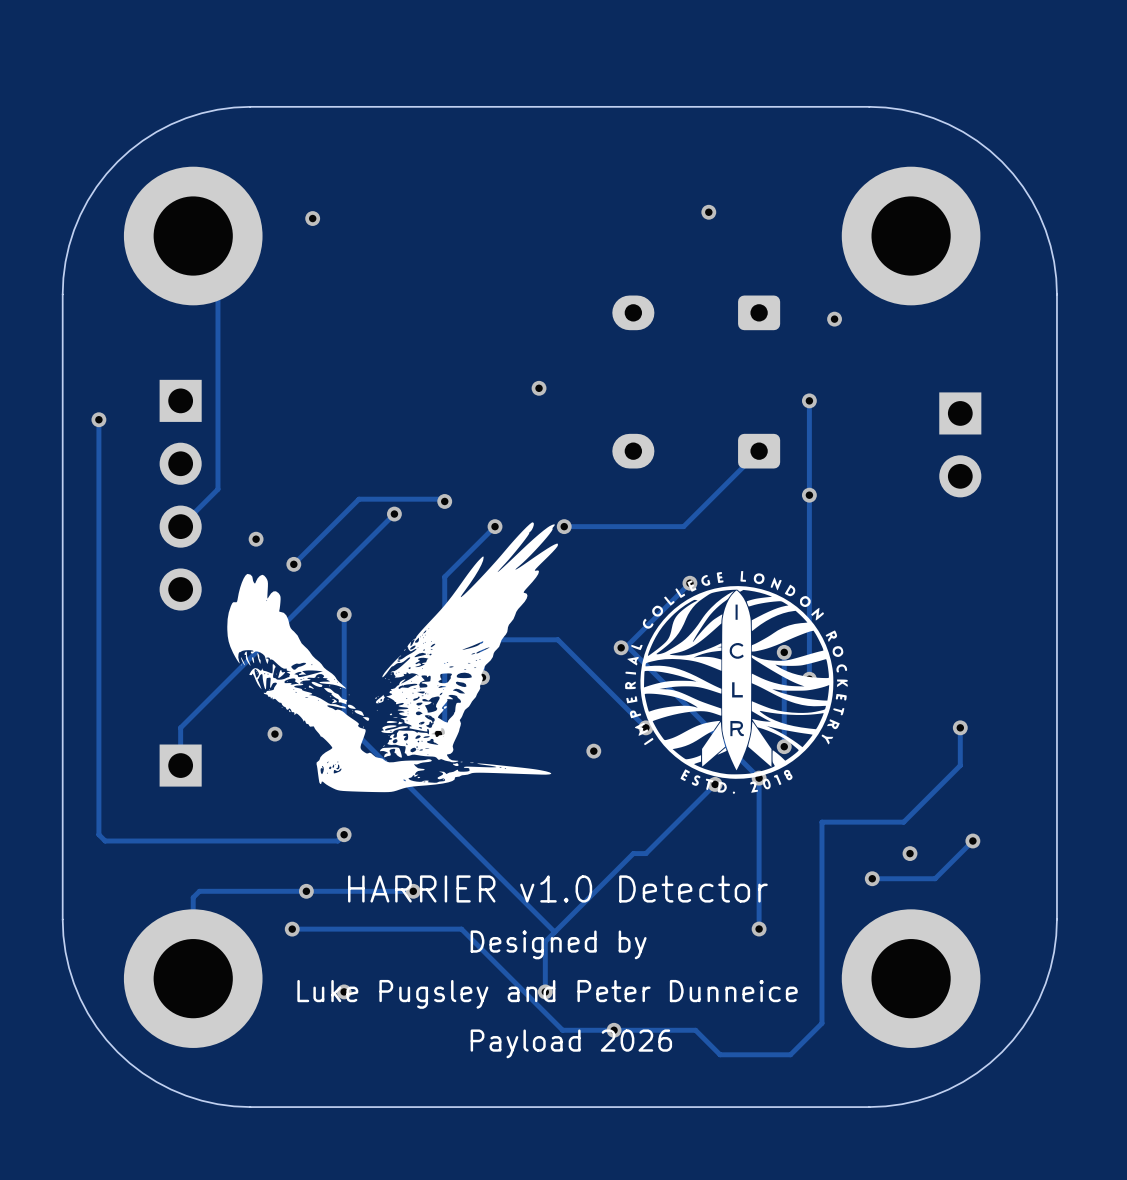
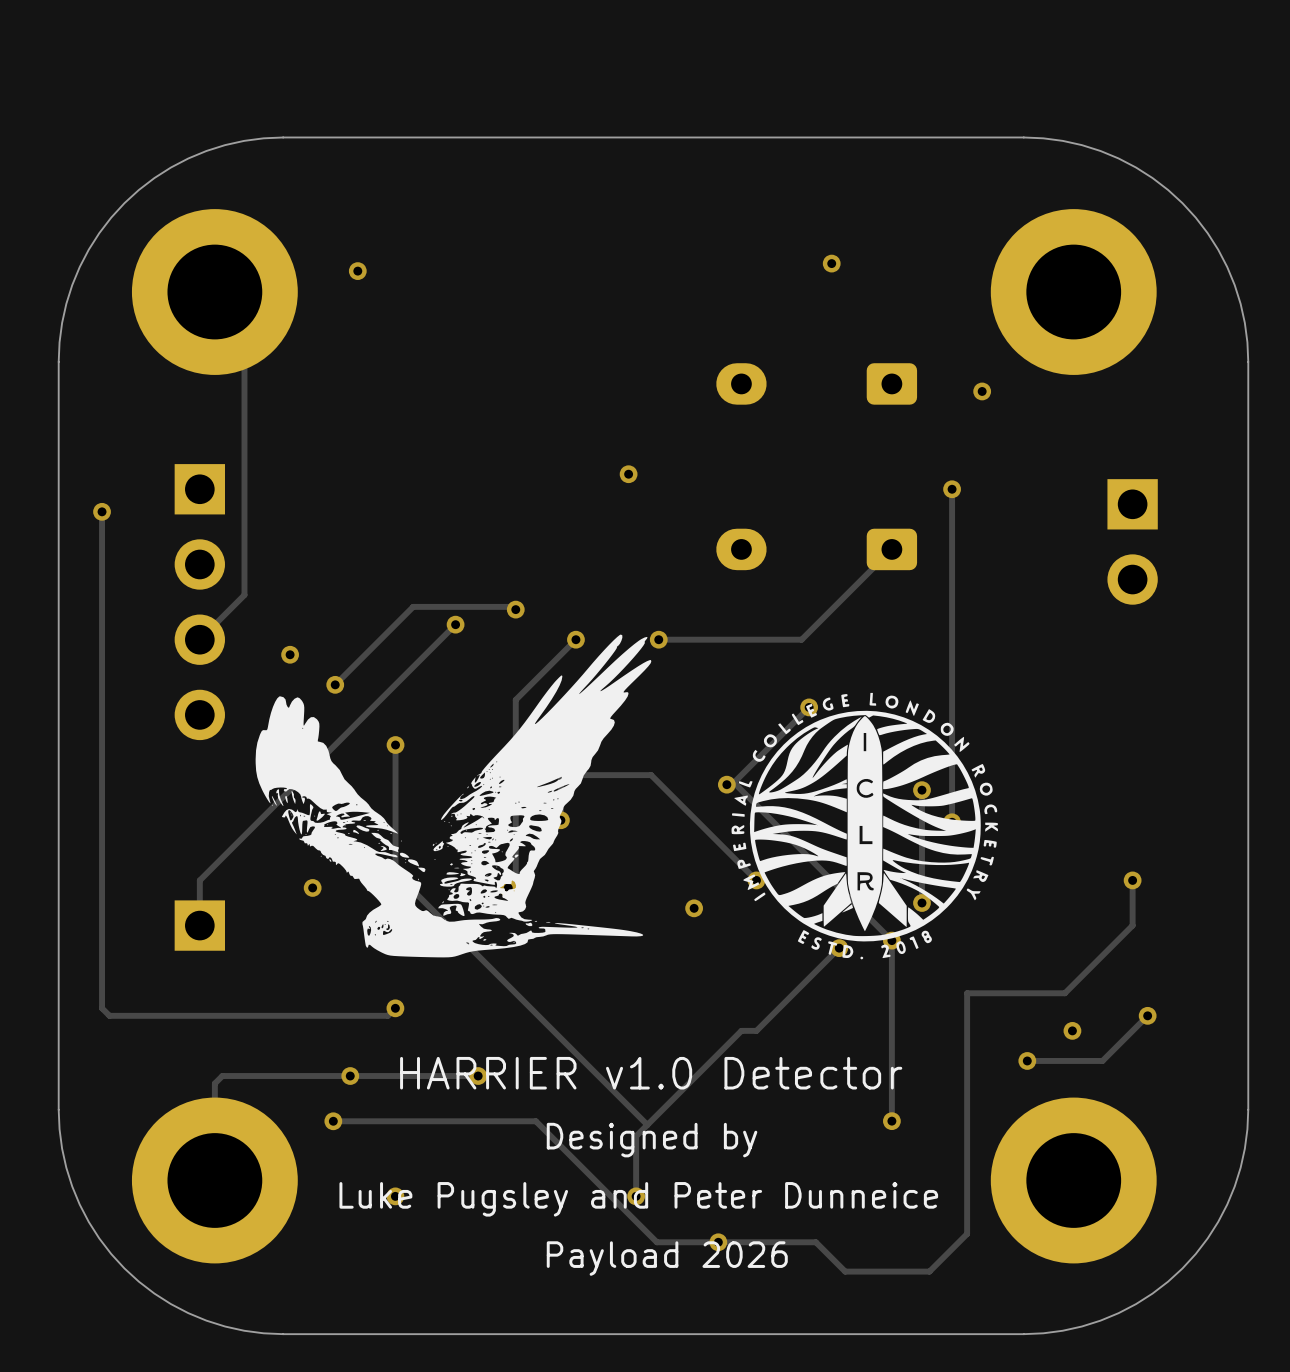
via: (809, 495) -> none

